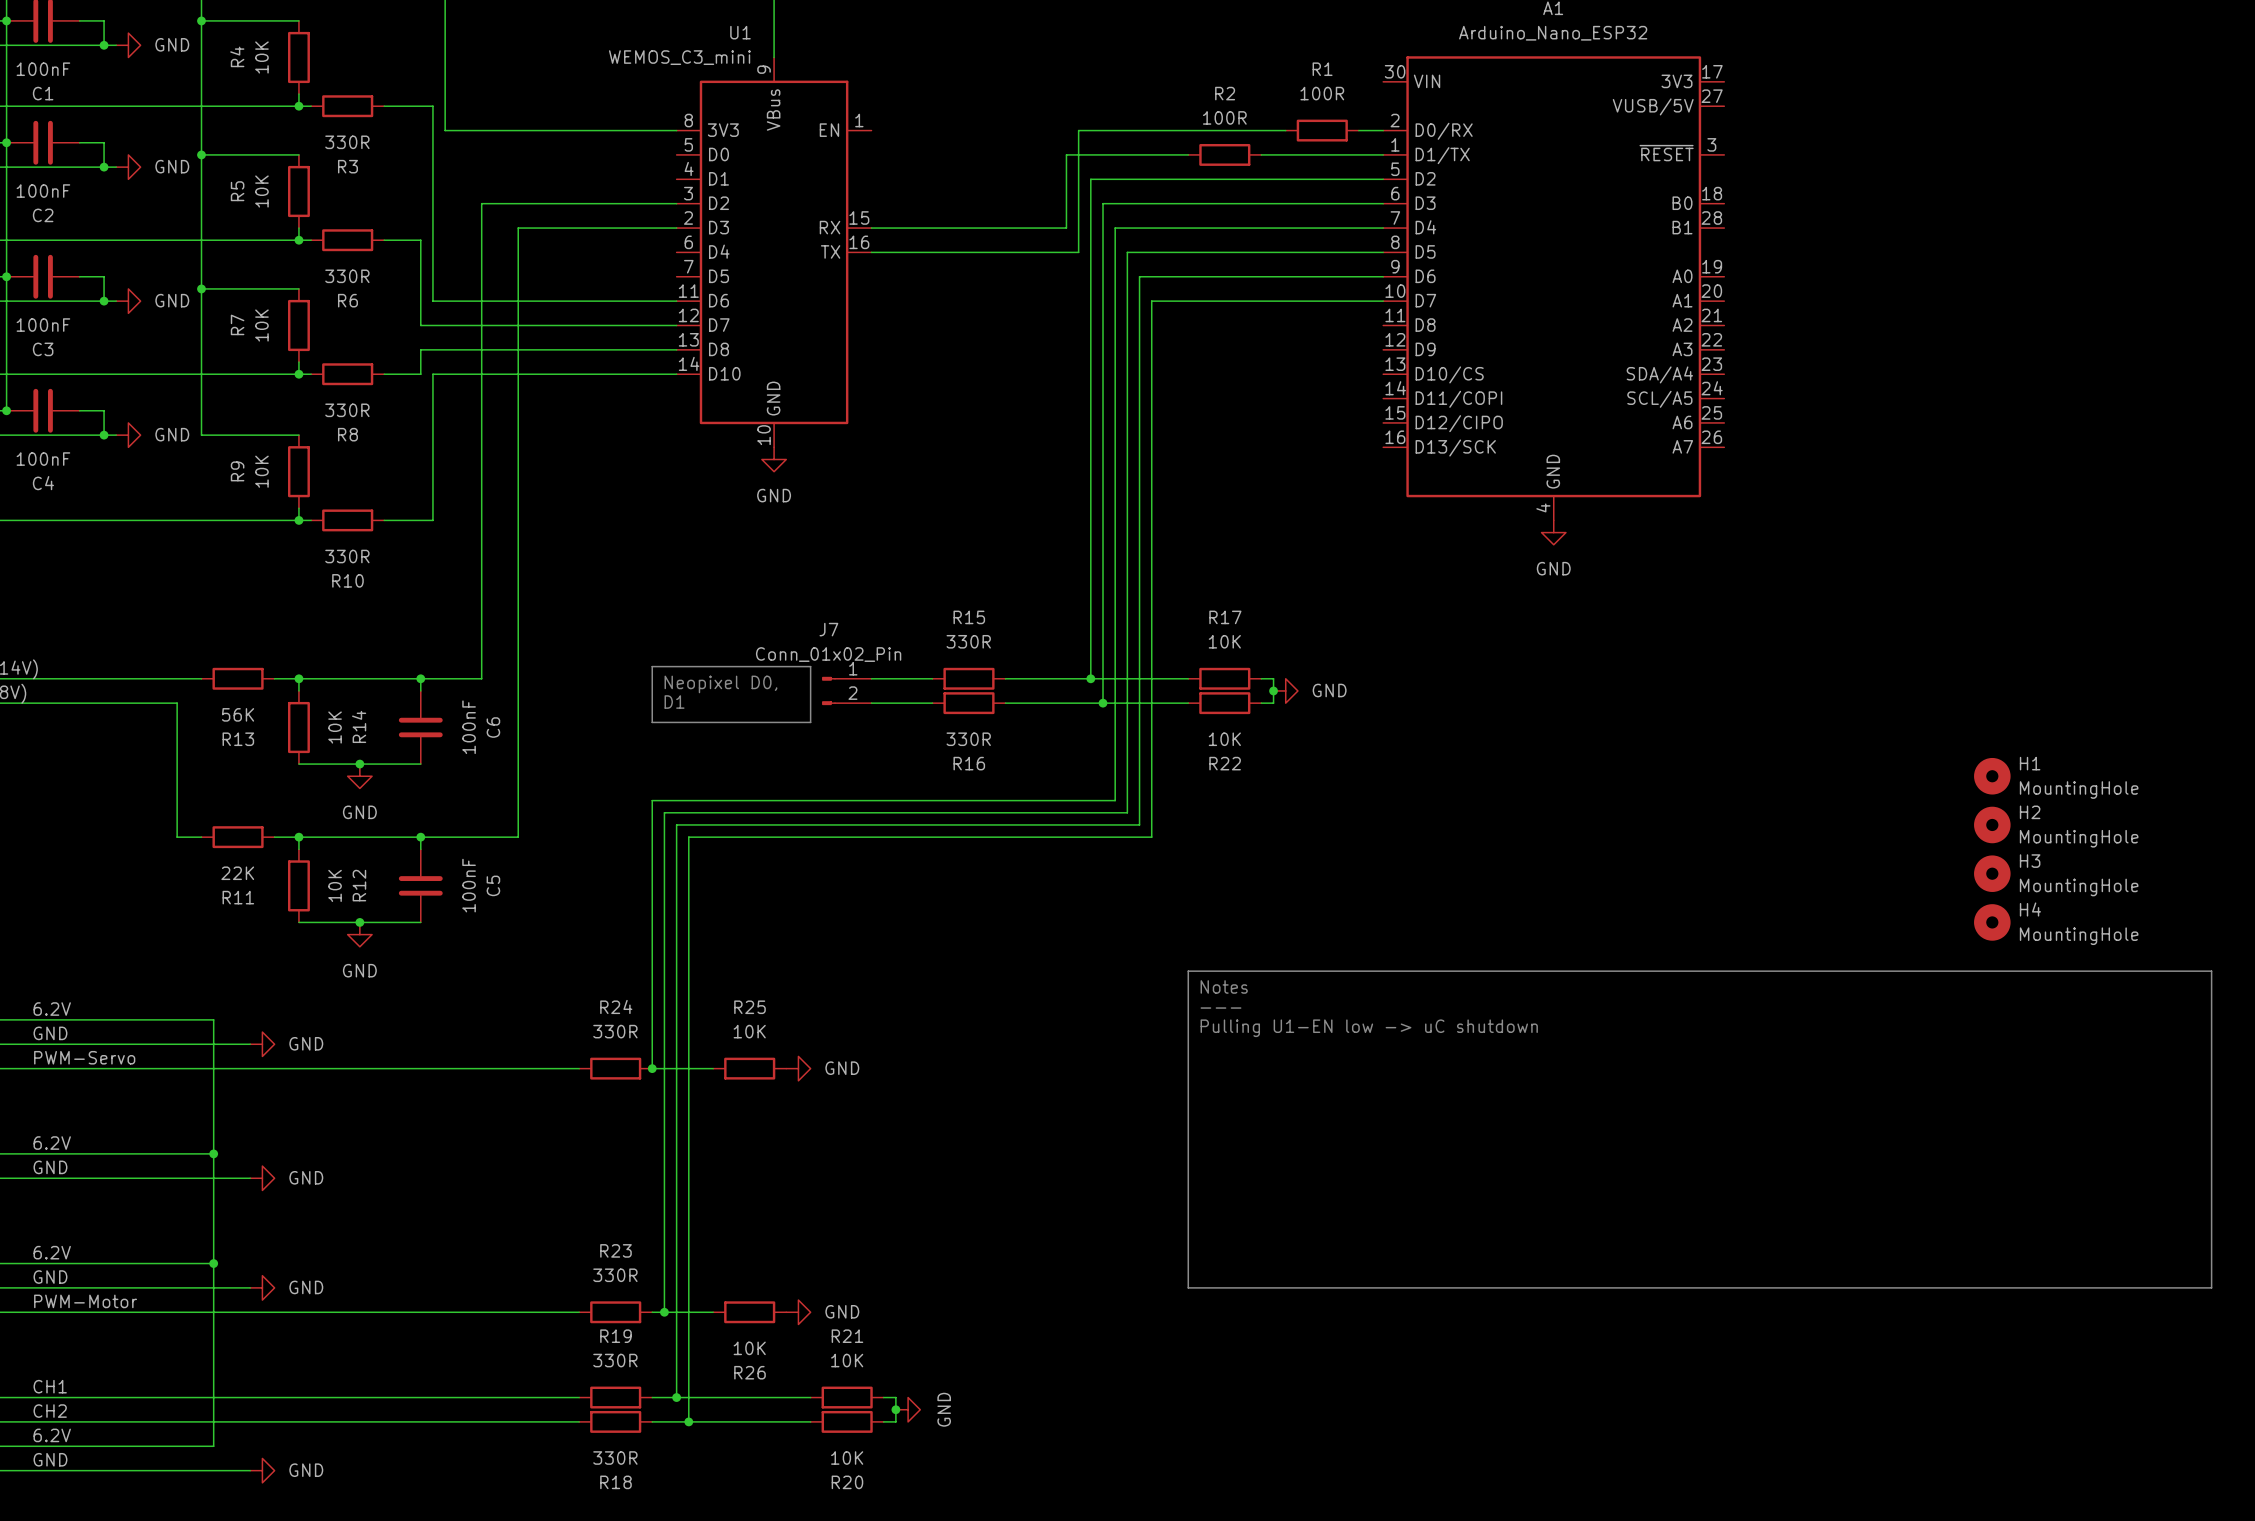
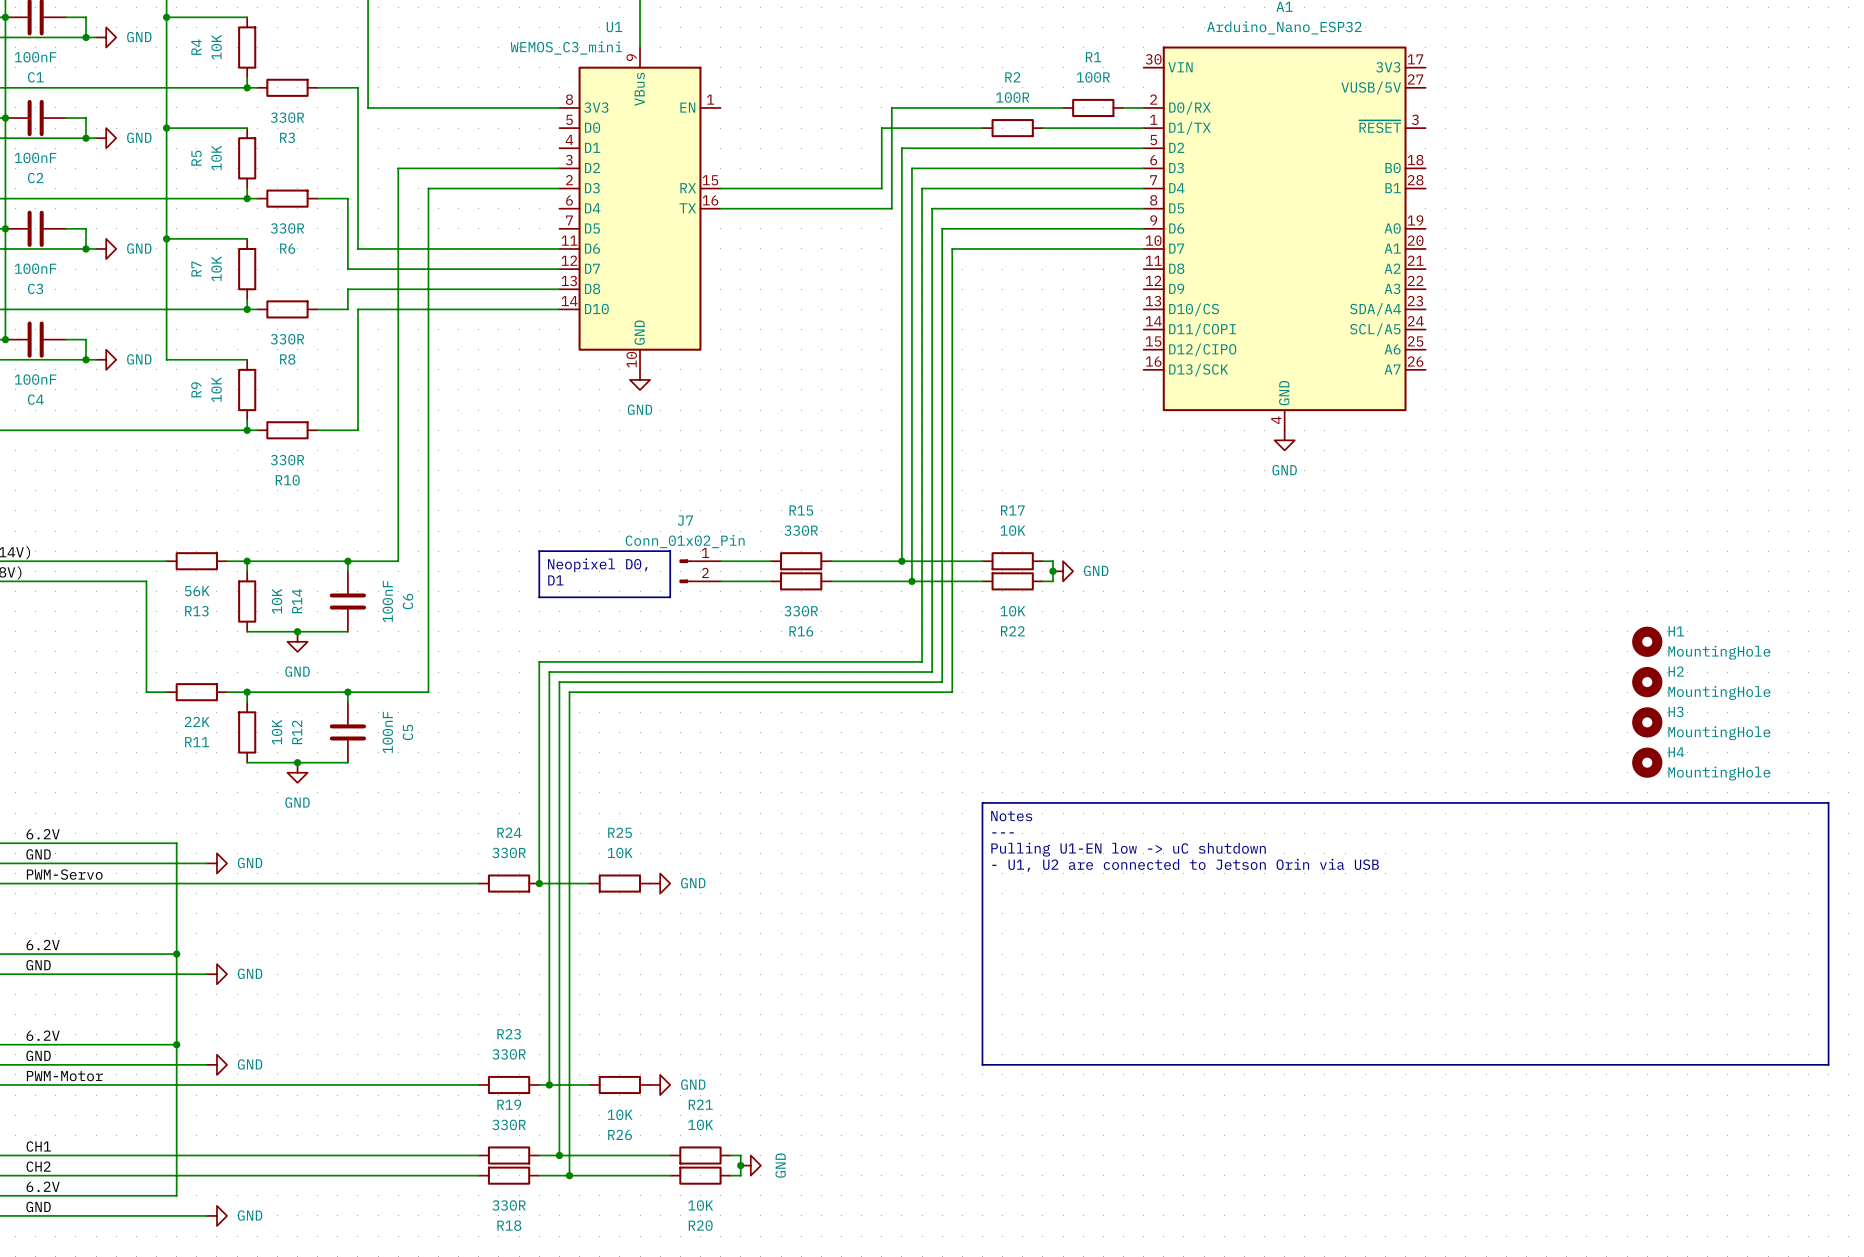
text: none -> - U1, U2 are connected to Jetson Orin via USB (1185, 865)

